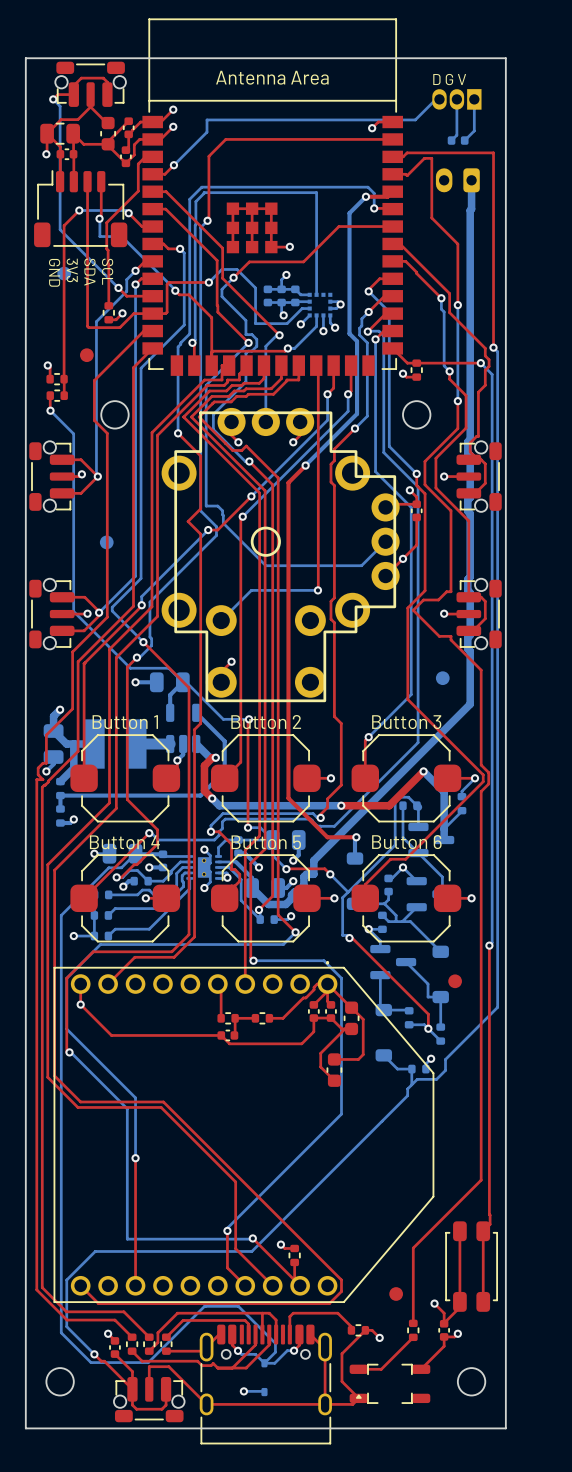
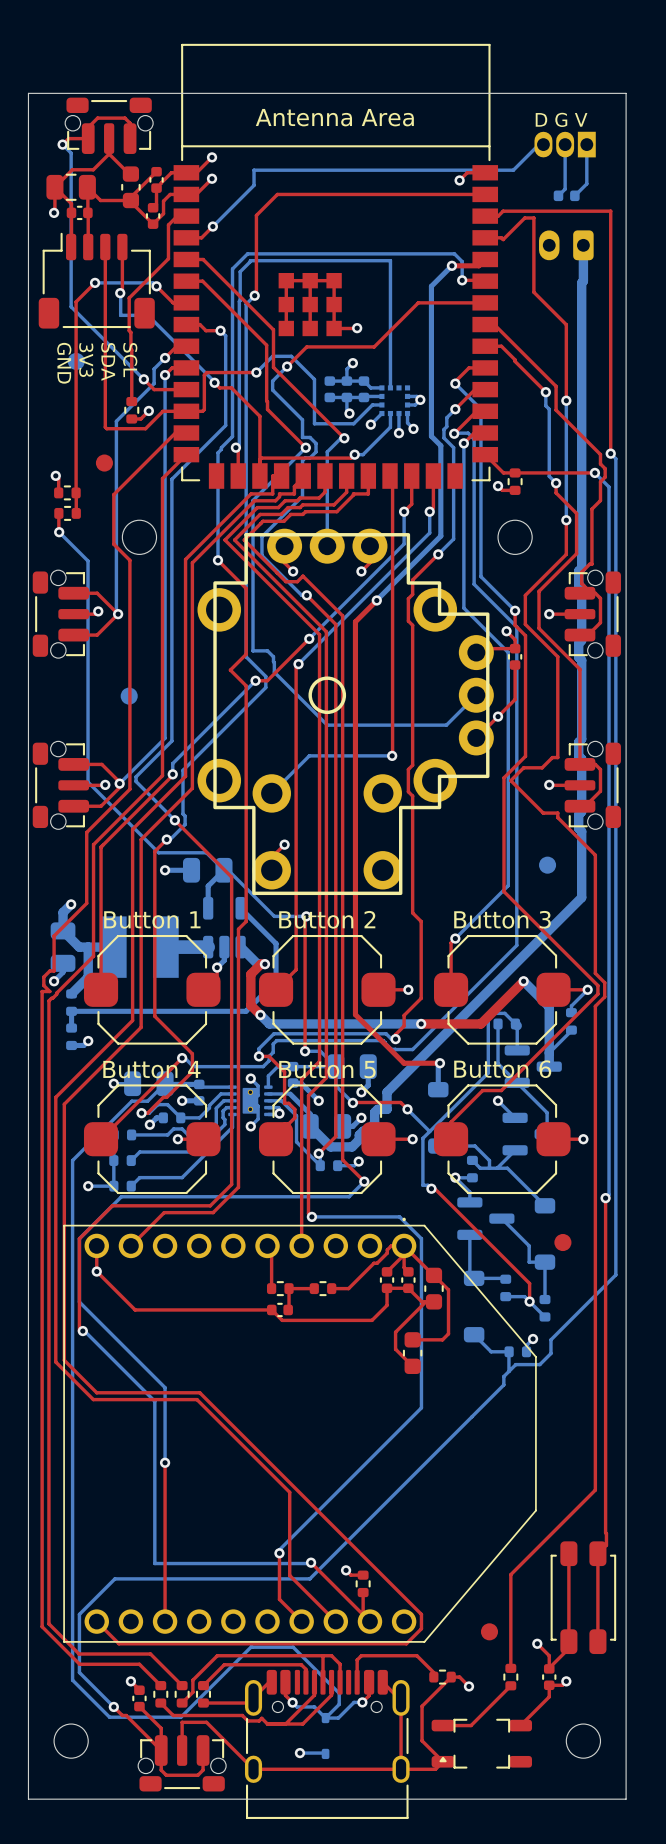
bottom track: (403, 867) (392, 878) (388, 878) -> none
part: (388, 885) -> none
bottom track: (388, 891) (388, 899) (384, 903) -> none

